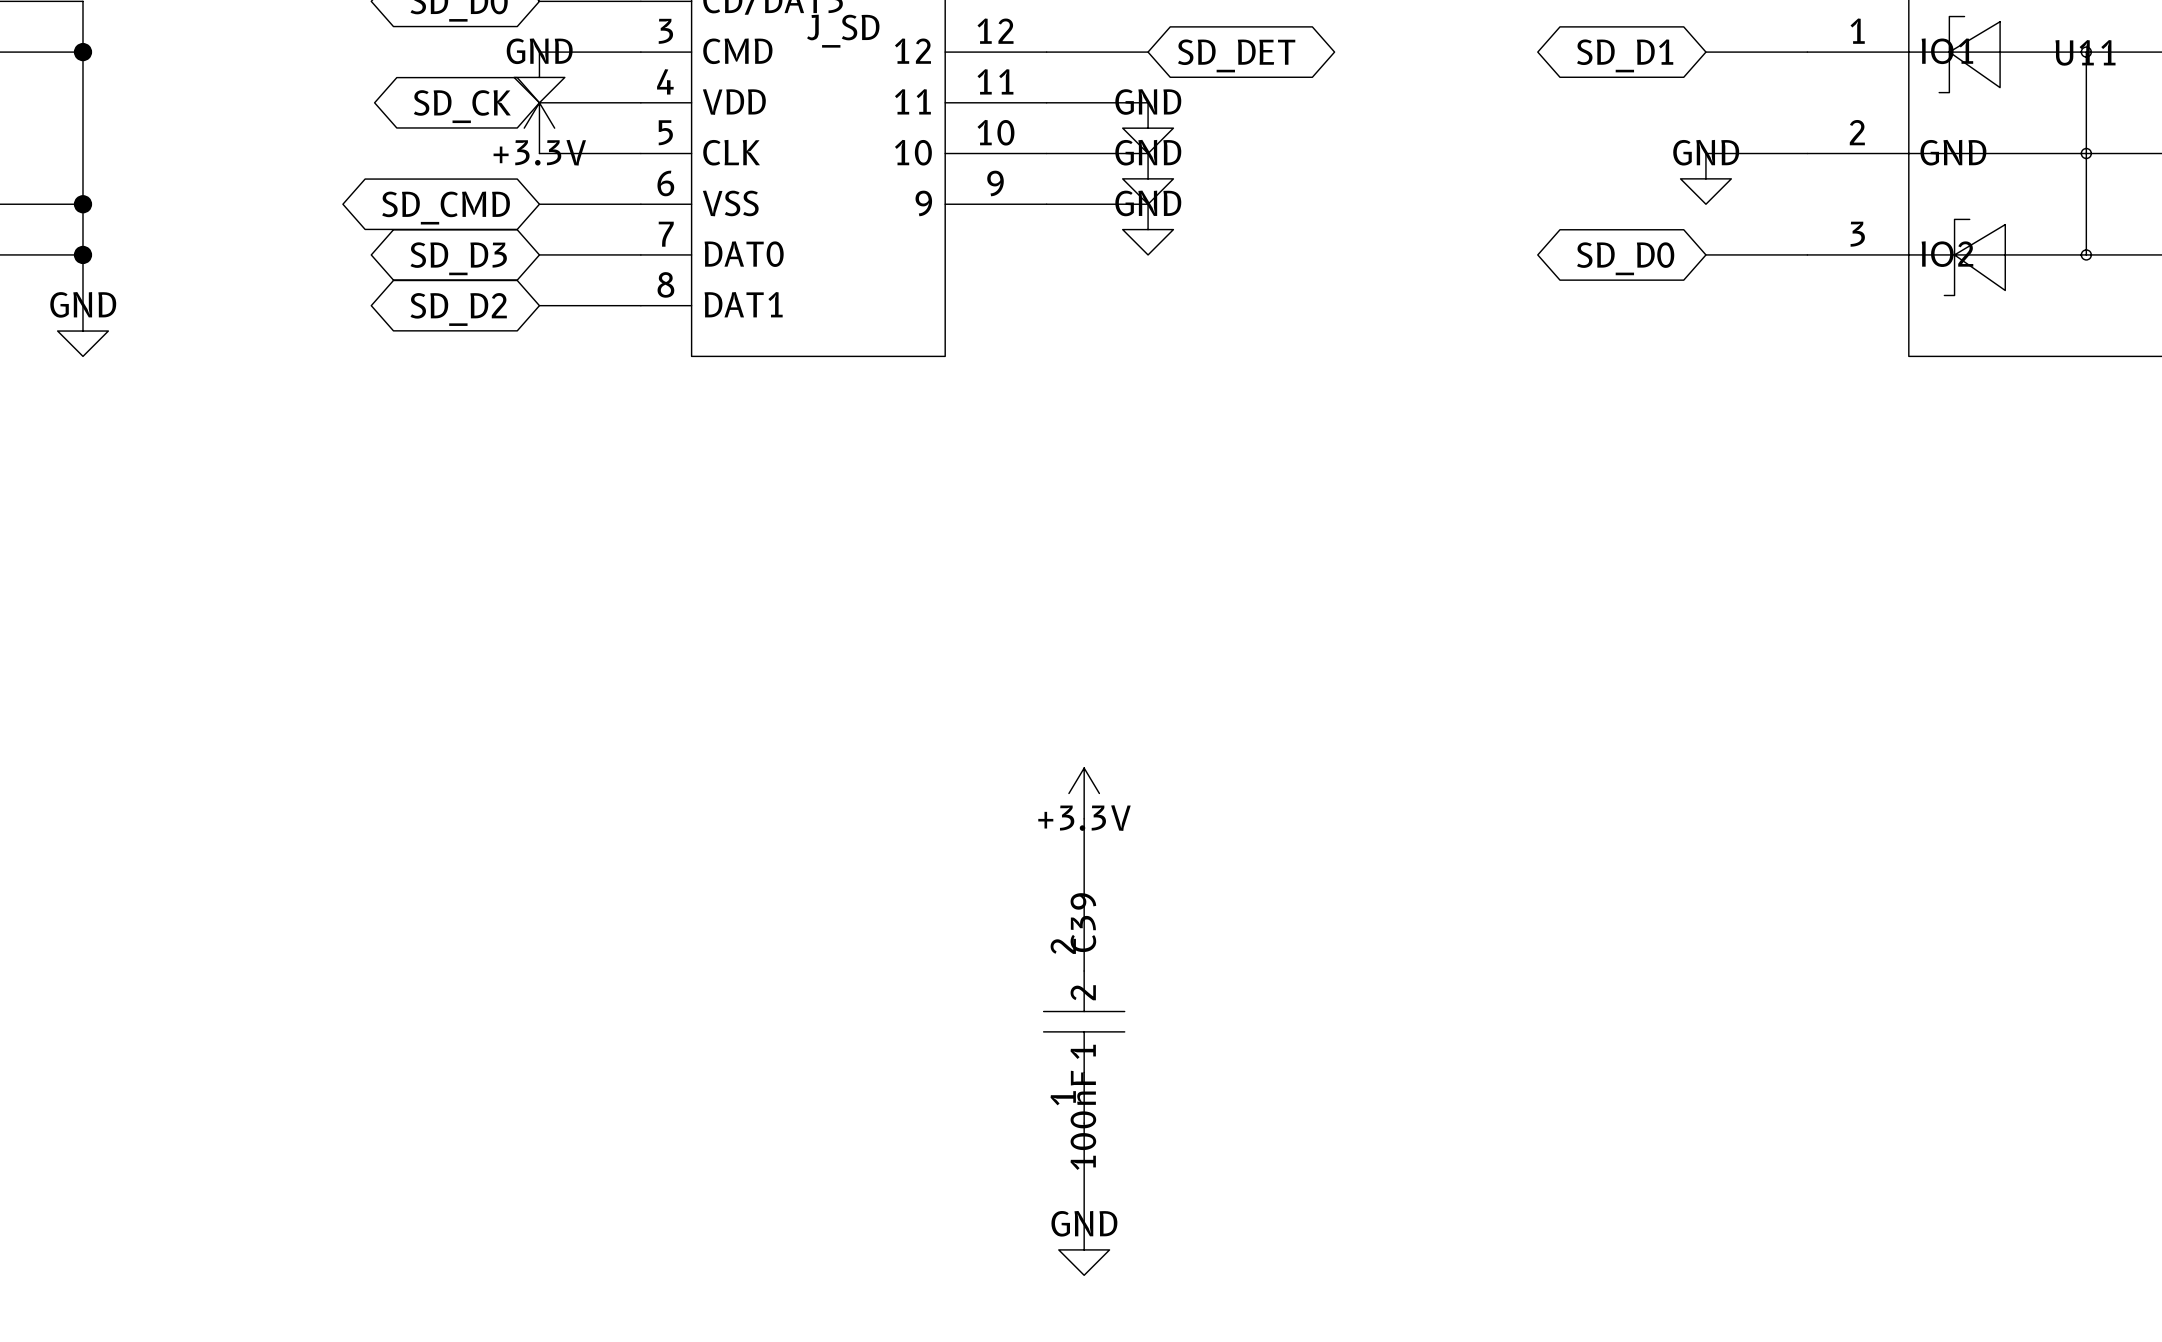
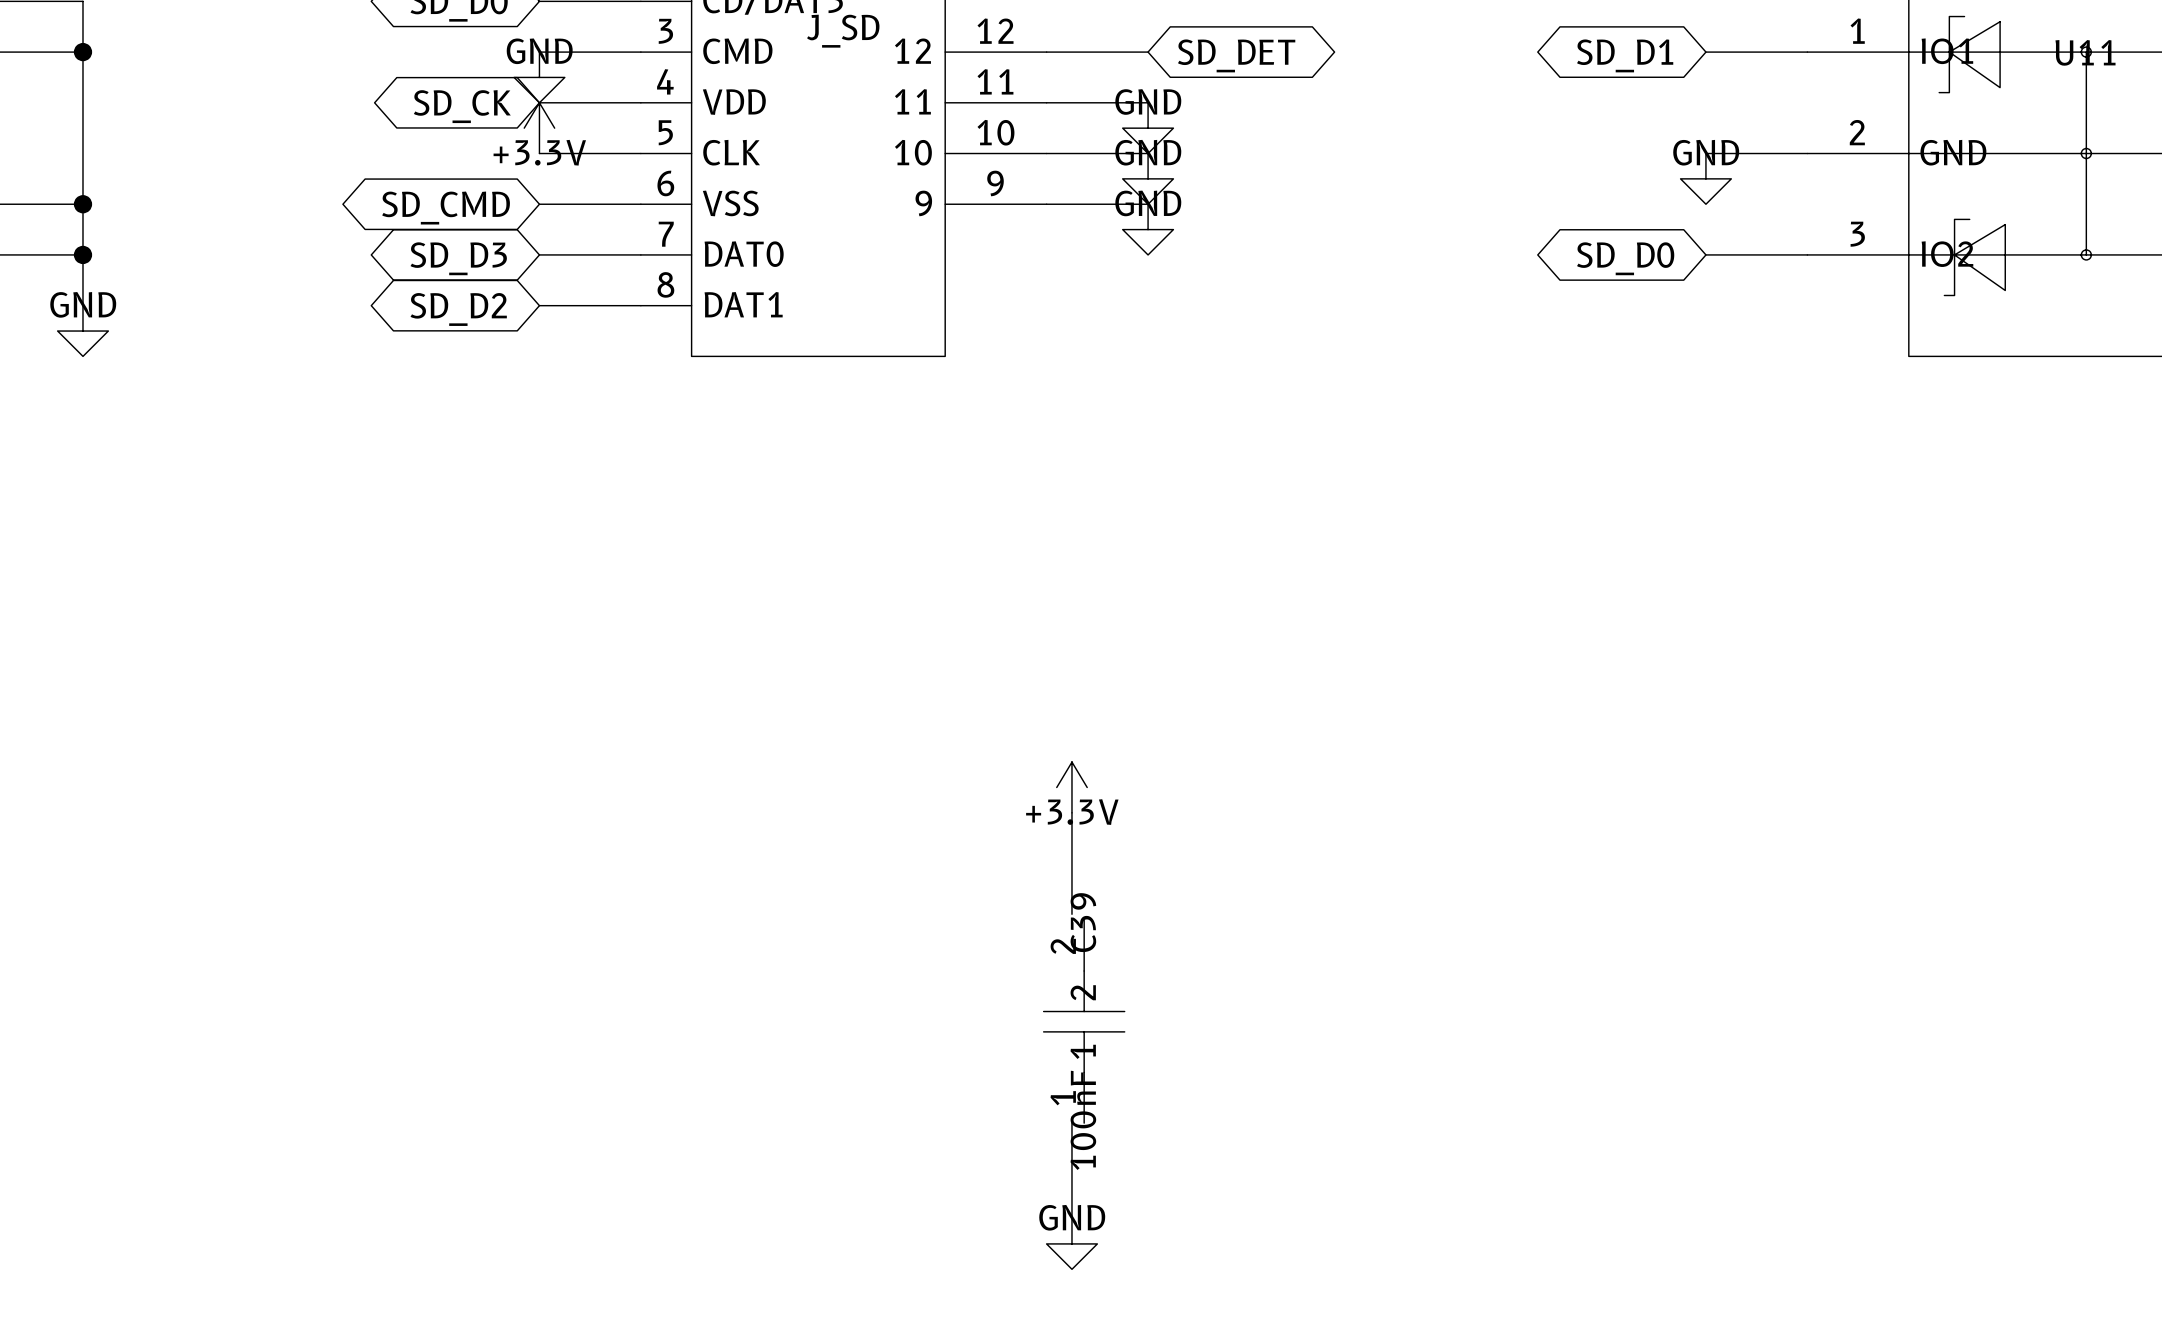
power symbol position: +3.3V (1084, 793) -> +3.3V (1071, 787)
wire: (1084, 818) (1084, 920) -> (1071, 812) (1071, 914)
wire: (1084, 1123) (1084, 1224) -> (1071, 1117) (1071, 1218)
power symbol position: GND (1084, 1249) -> GND (1071, 1243)

